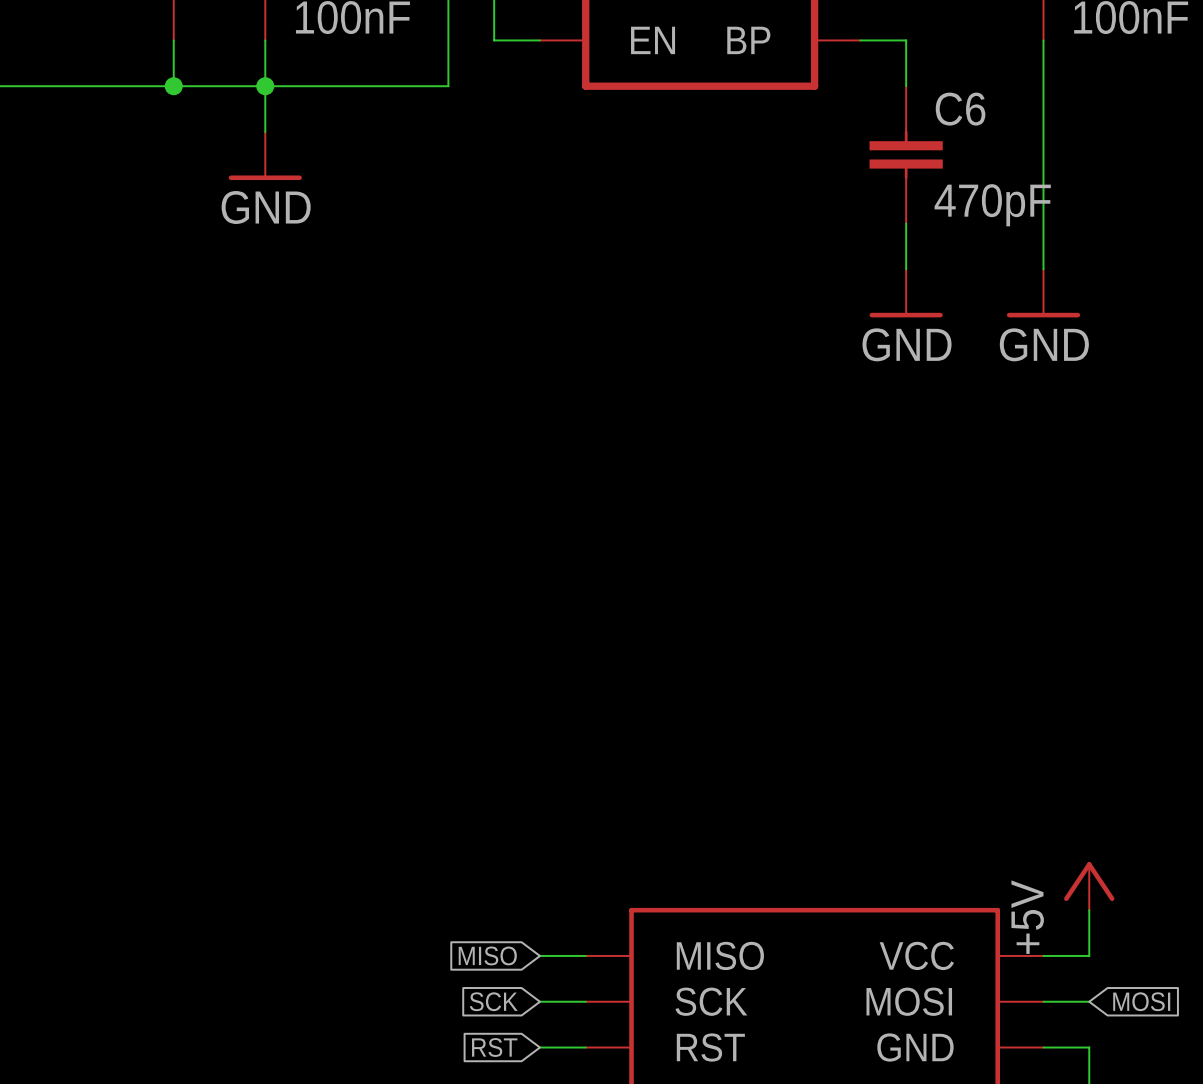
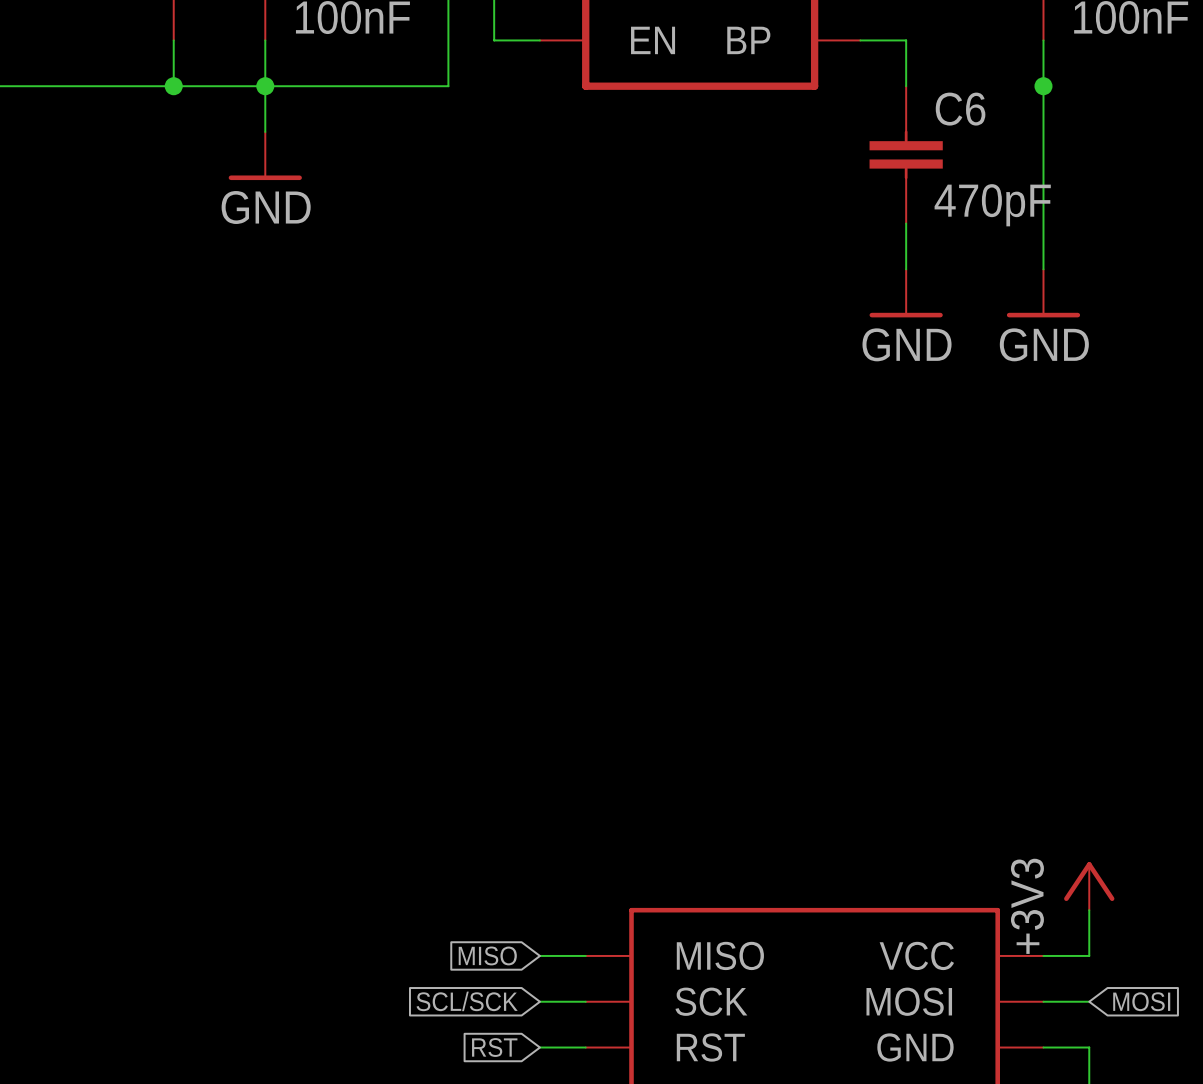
junction: none -> (1043, 86)
power symbol: +5V (1089, 886) -> +3V3 (1089, 886)
global label: SCK (493, 1001) -> SCL/SCK (467, 1001)

